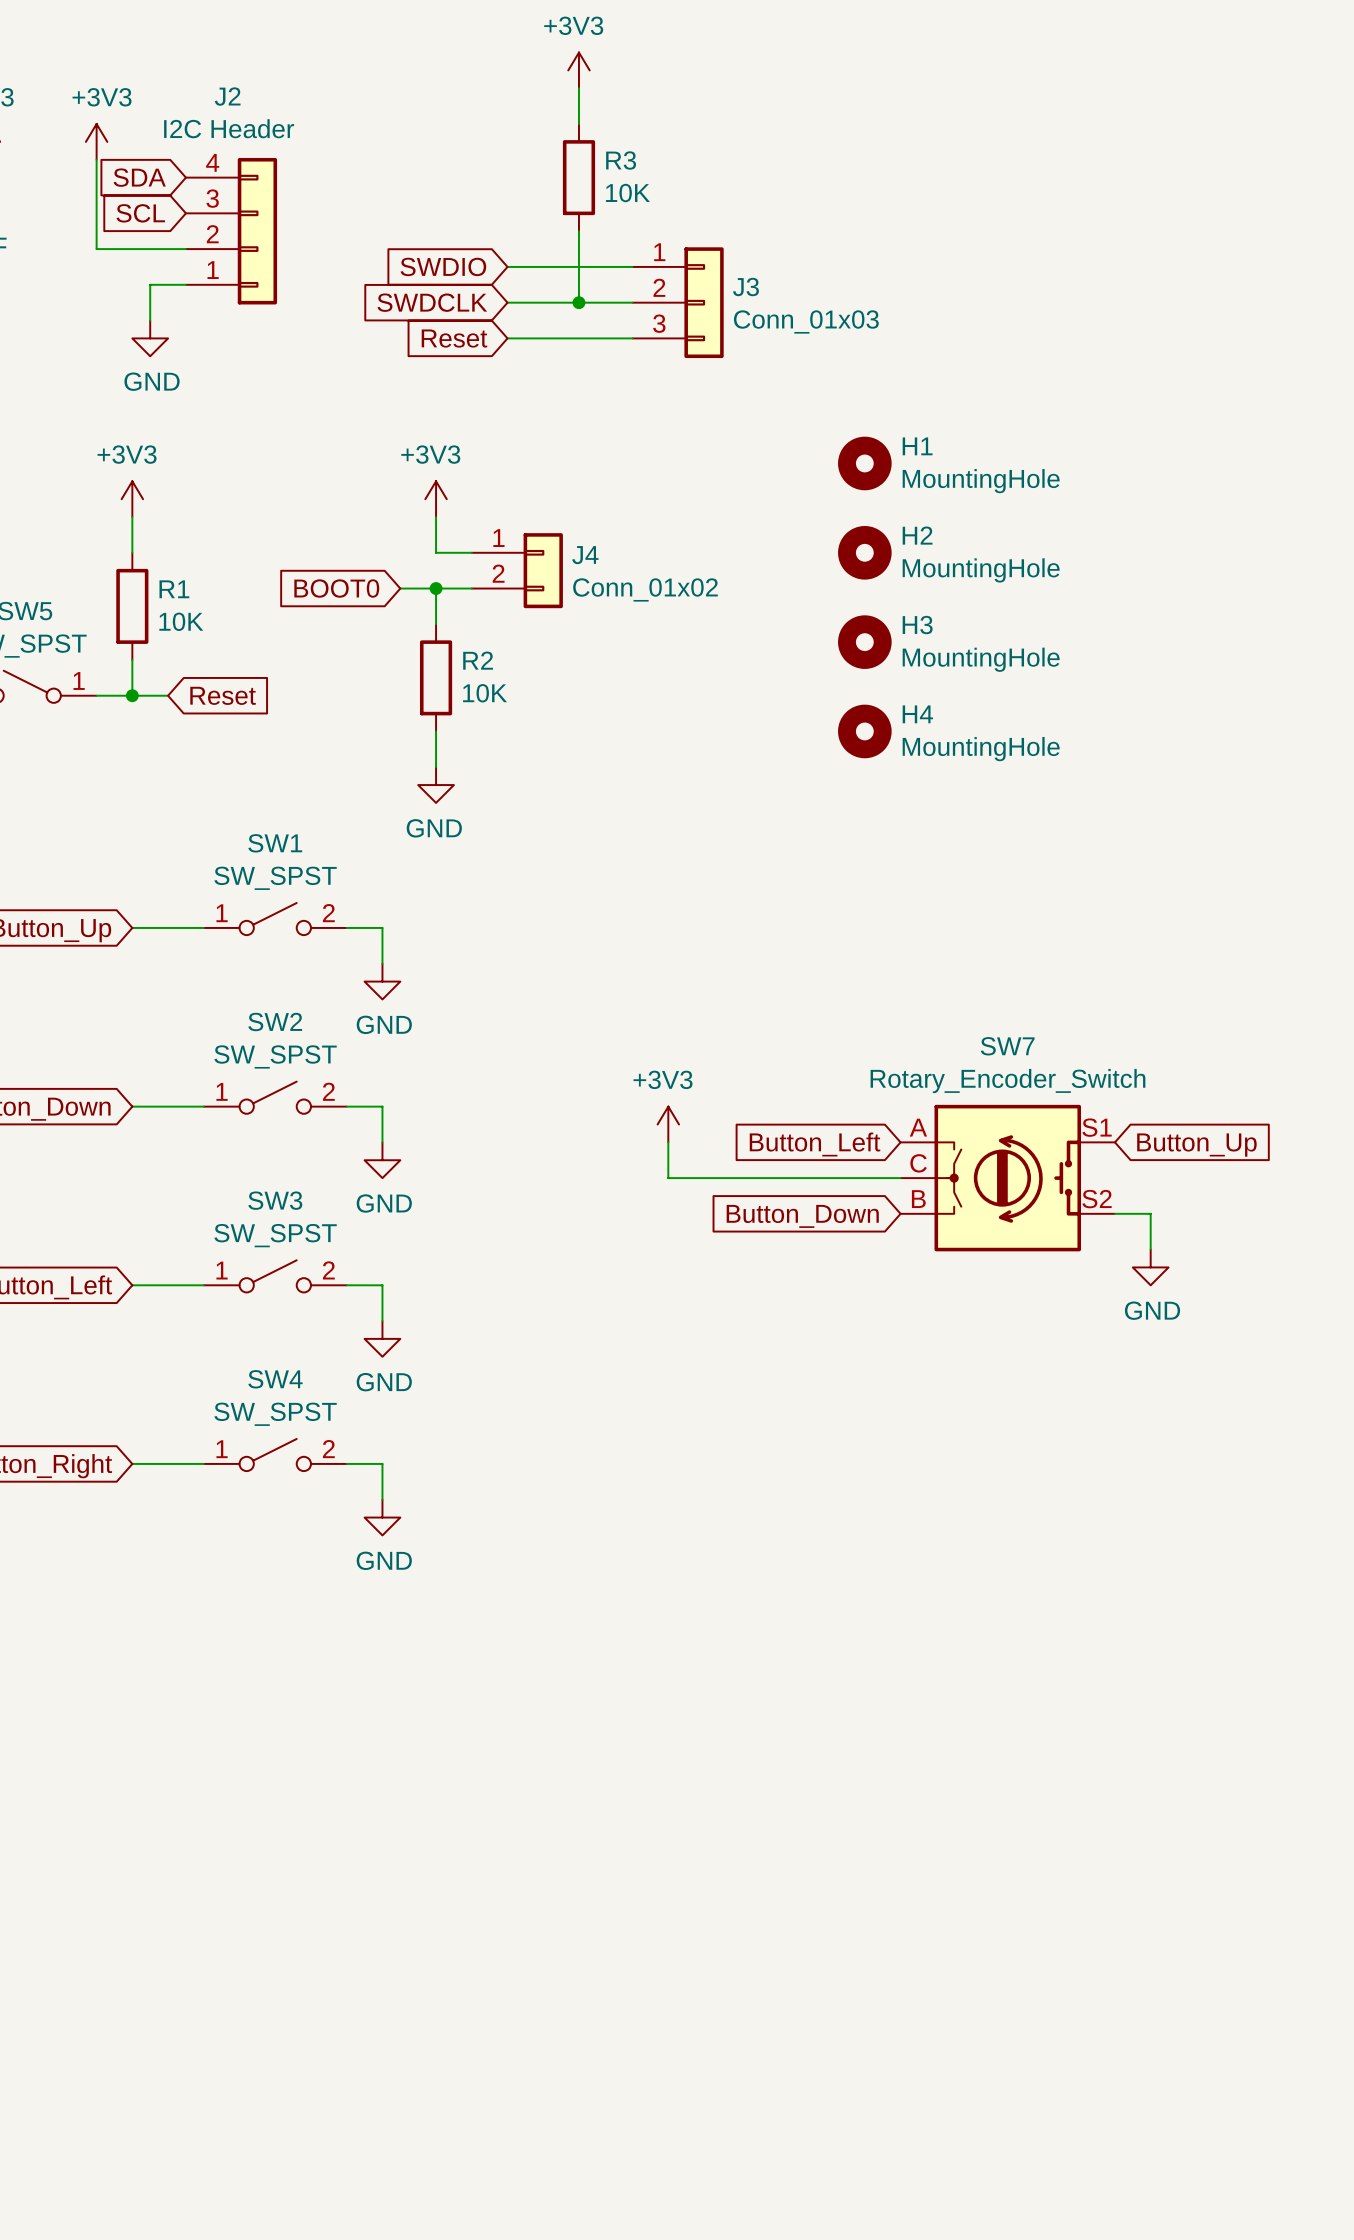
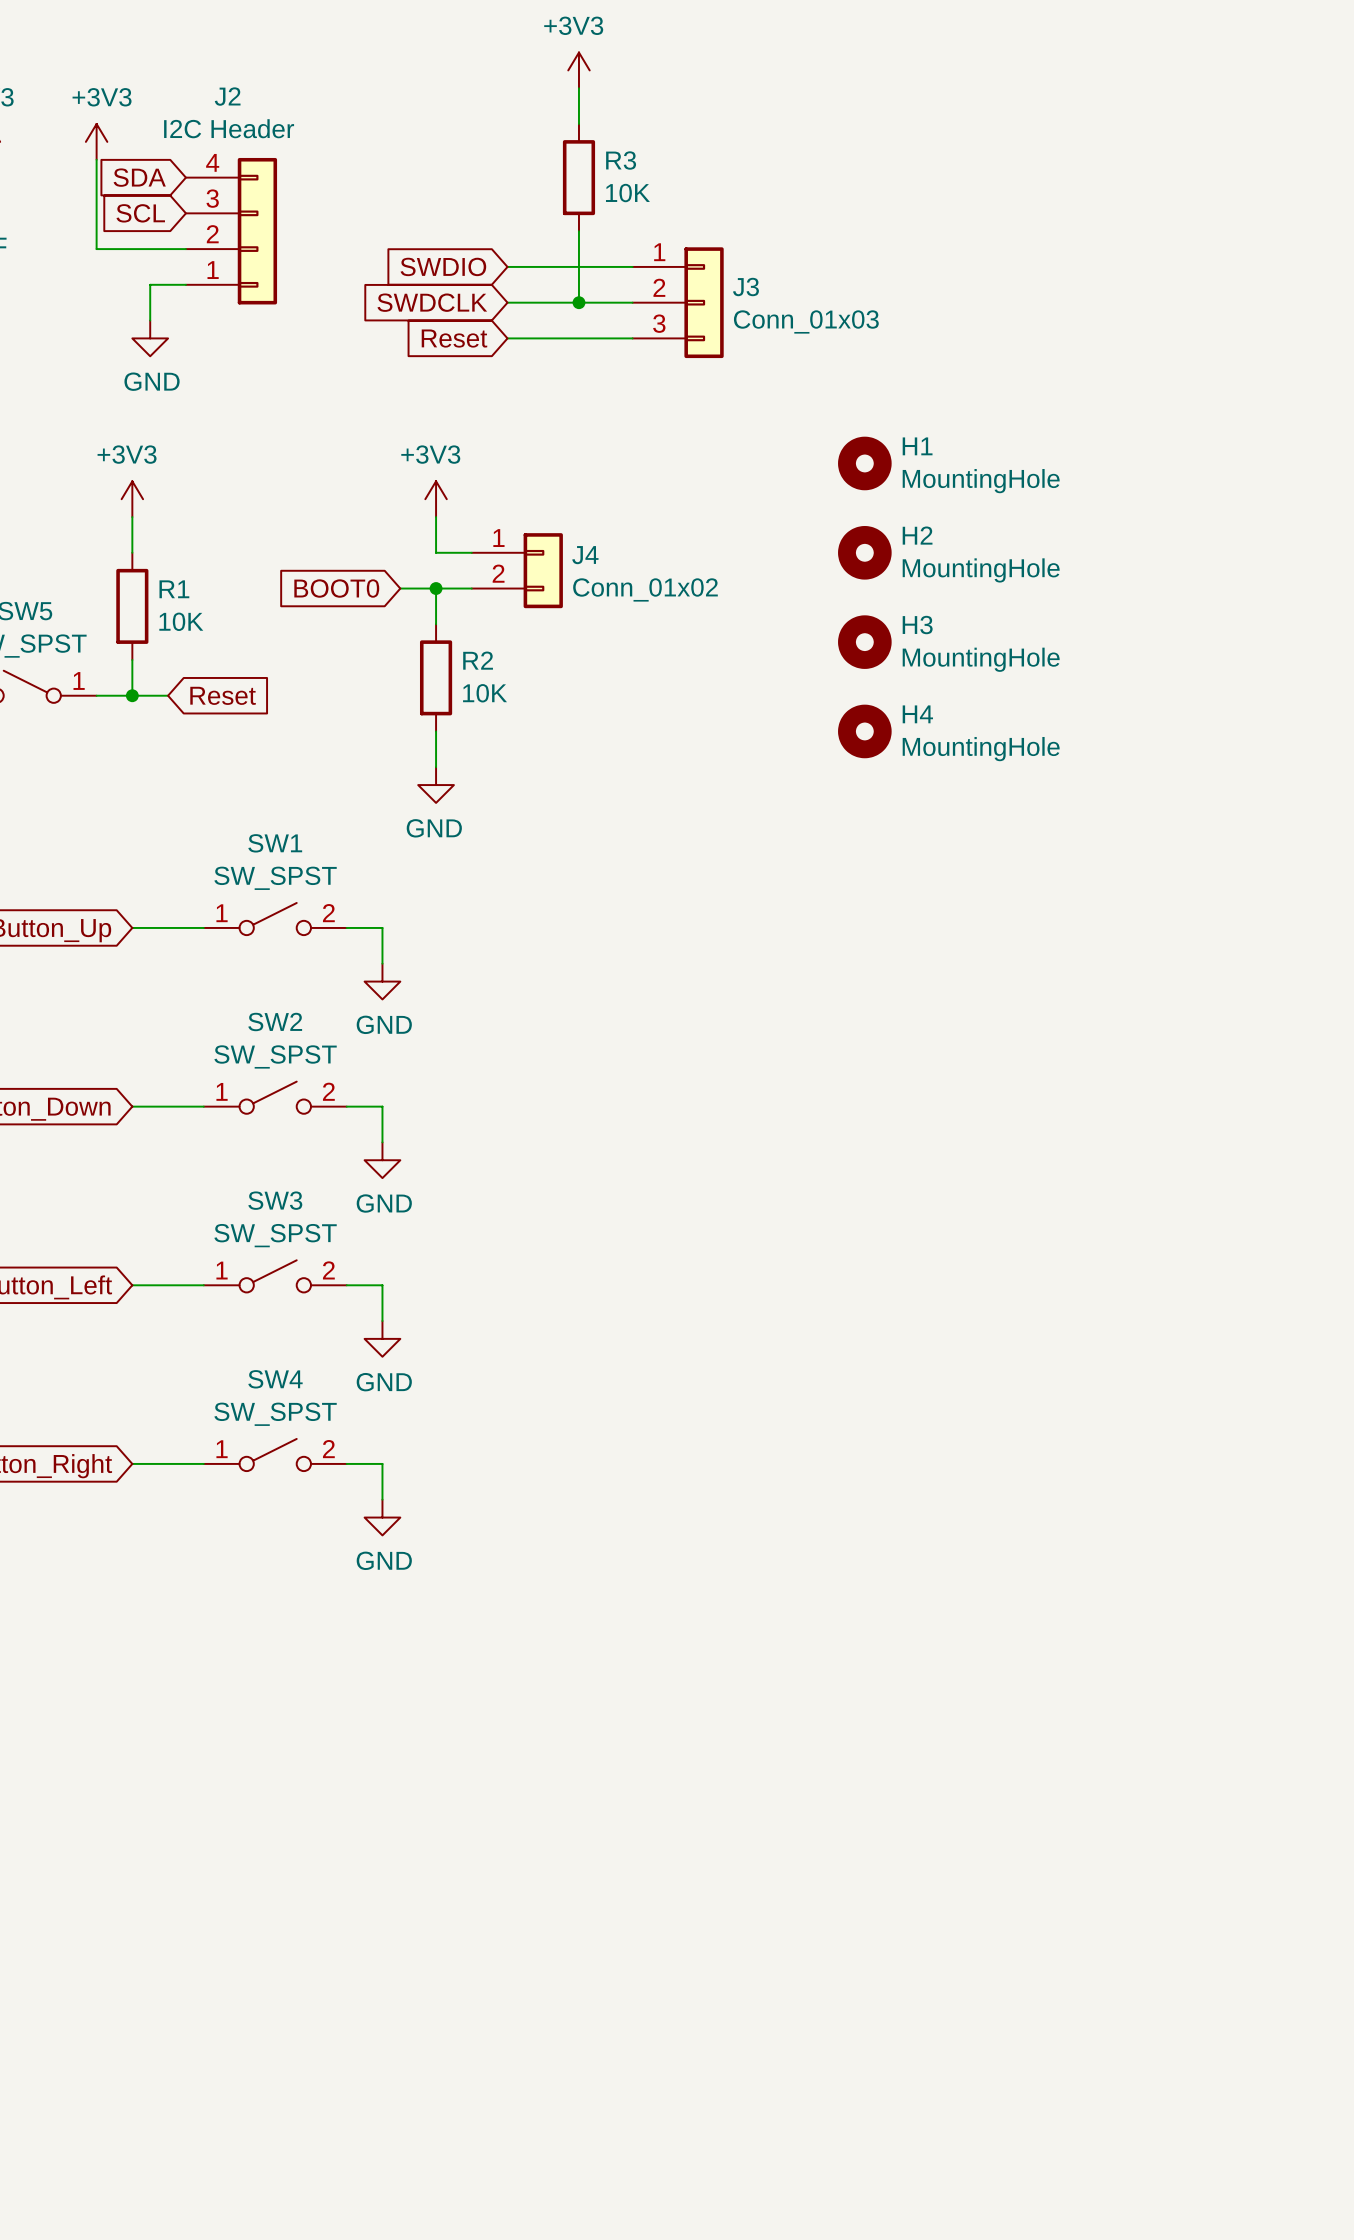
power symbol: +3V3 (668, 1124) -> none
wire: (668, 1142) (668, 1178) (900, 1178) -> none
global label: Button_Left (815, 1144) -> none
global label: Button_Up (1196, 1145) -> none
SW7: Rotary_Encoder_Switch (1007, 1178) -> none
wire: (1114, 1213) (1150, 1213) (1150, 1249) -> none
global label: Button_Down (802, 1216) -> none
power symbol: GND (1150, 1267) -> none

